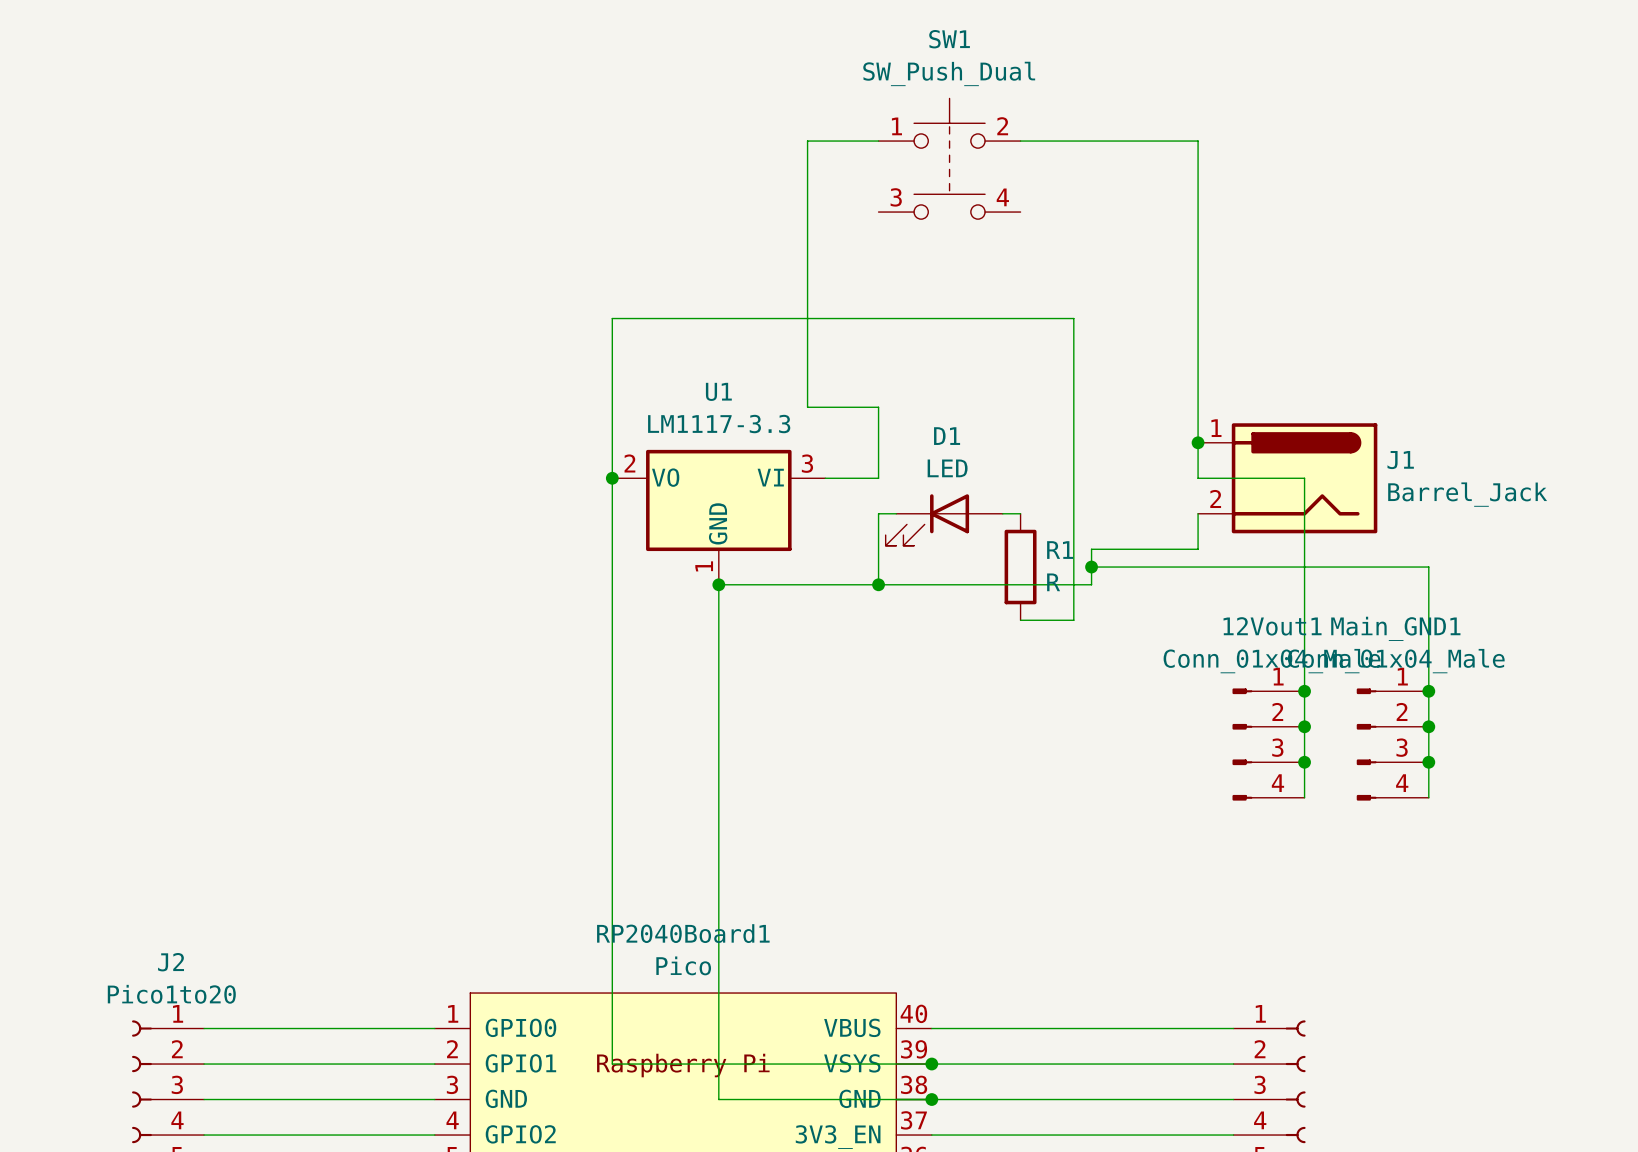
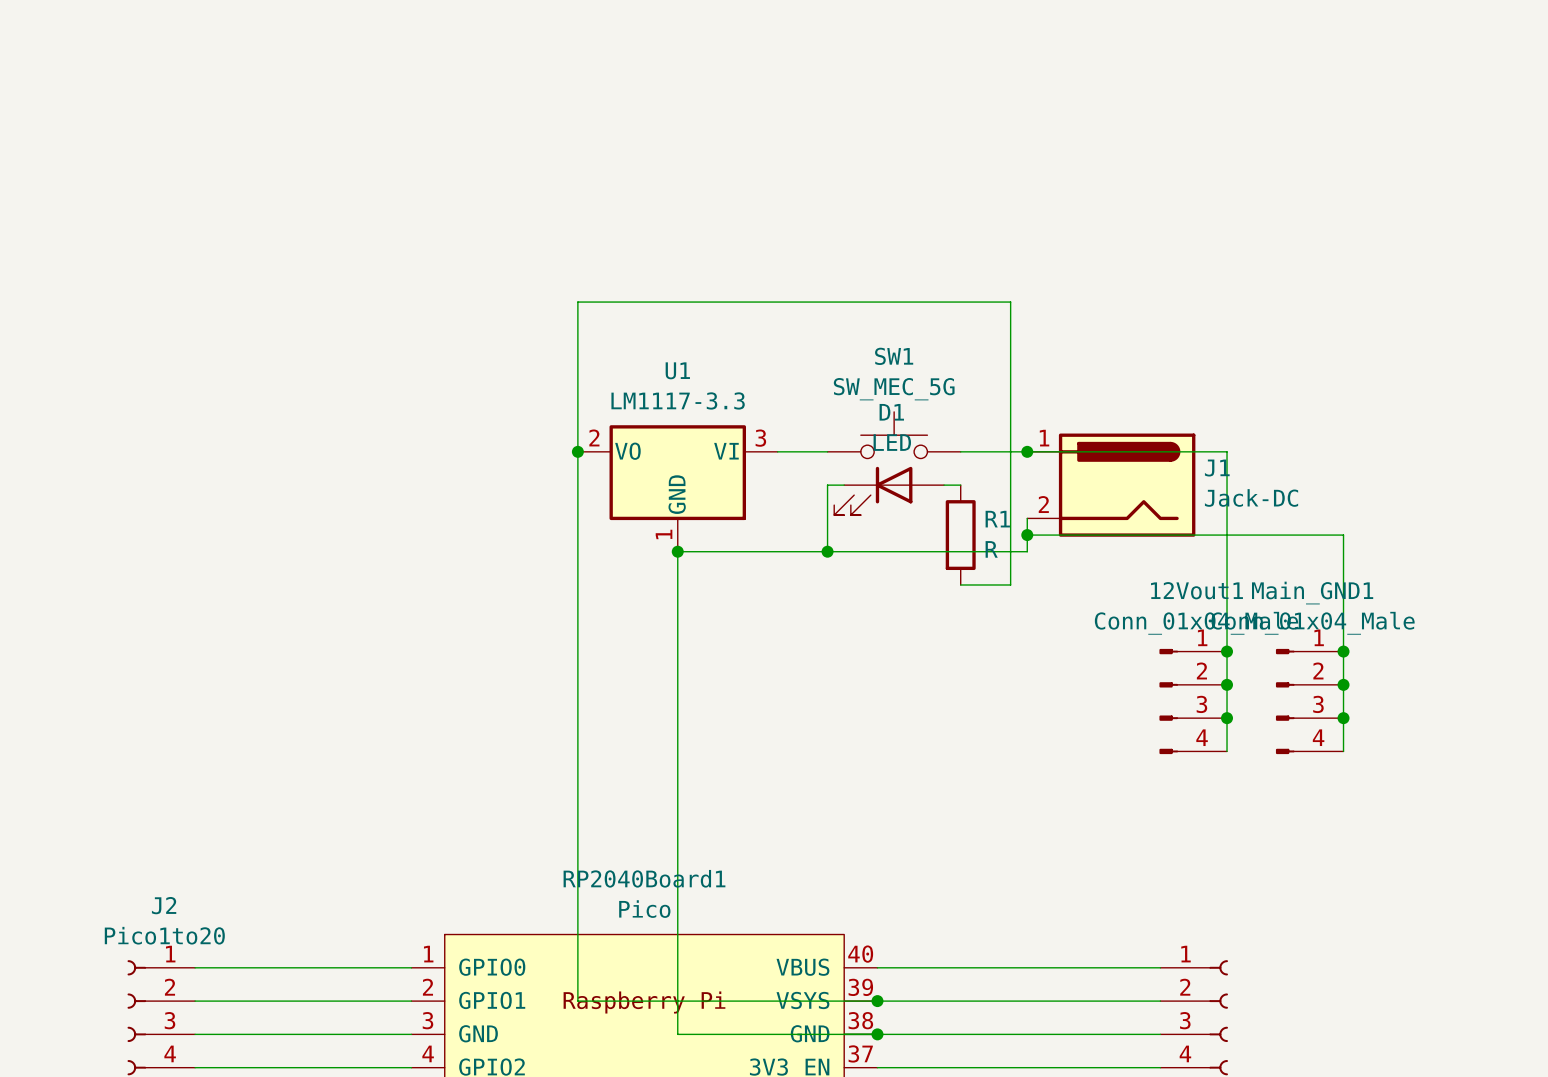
SW1 name position: SW1 (949, 39) -> SW1 (894, 356)
SW1 value: SW_Push_Dual (949, 73) -> SW_MEC_5G (894, 389)
SW1 symbol: [878, 98, 1021, 220] -> [827, 411, 961, 459]
wire: (878, 141) (807, 141) (807, 407) (878, 407) (878, 478) -> none
wire: (1020, 141) (1198, 141) (1198, 478) -> (960, 451) (1127, 451)
junction: (1198, 442) -> none
junction: none -> (1027, 451)
J1 position: (1287, 478) -> (1111, 485)
J1 value: Barrel_Jack (1467, 494) -> Jack-DC (1251, 497)

